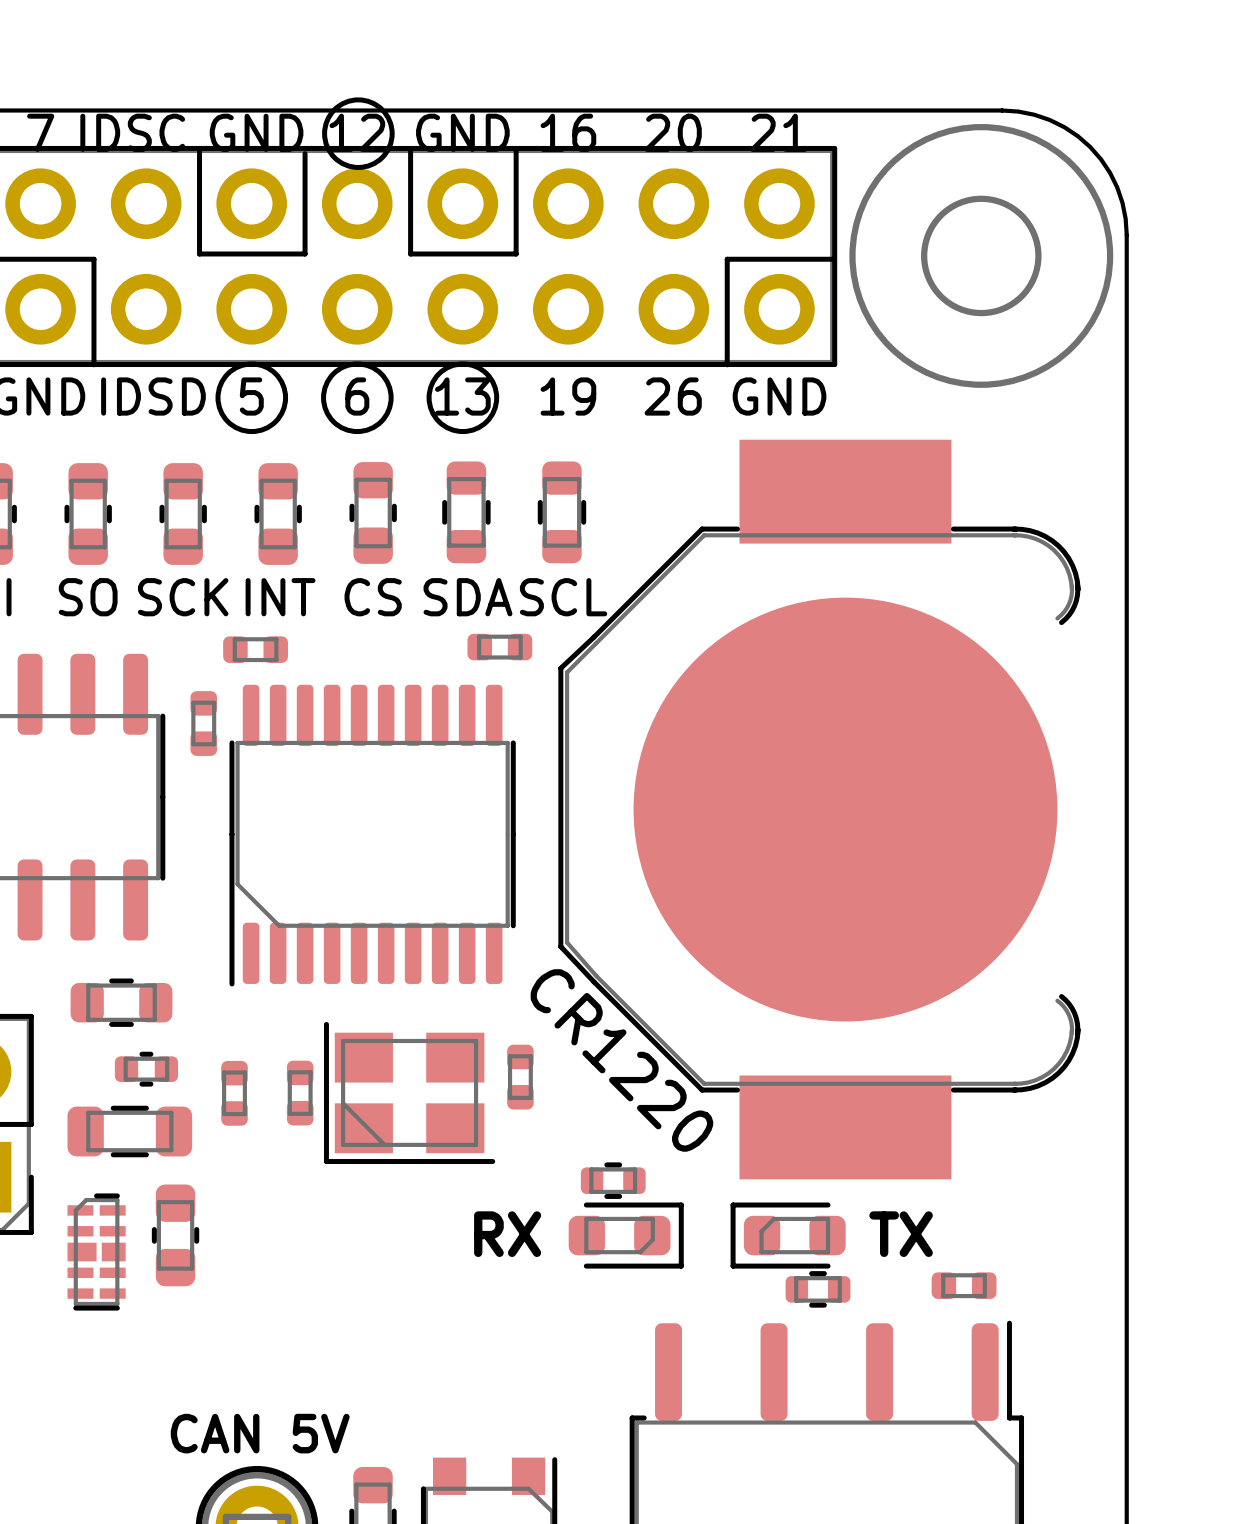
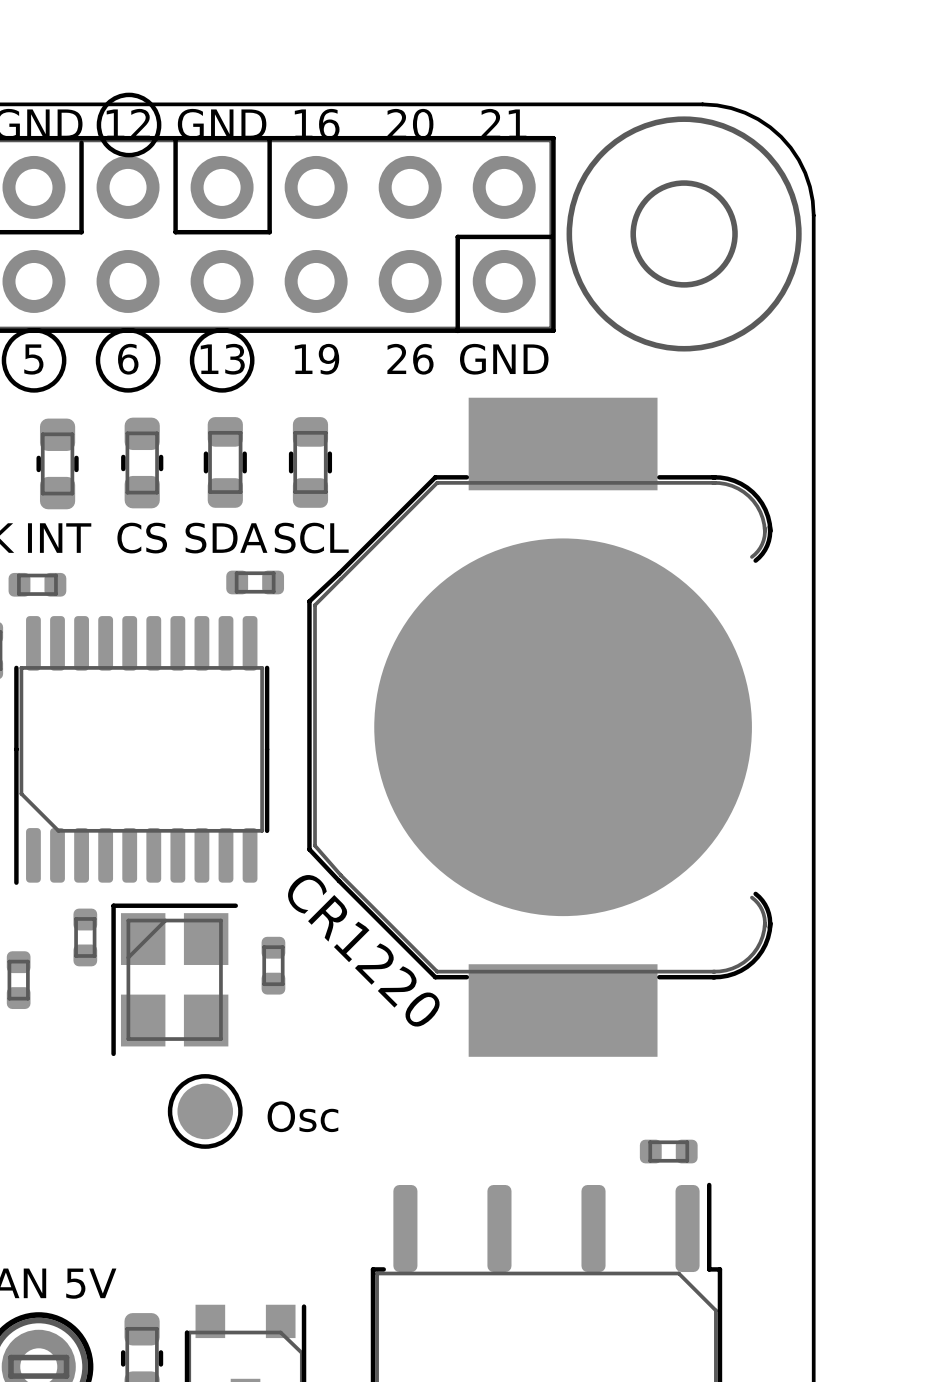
part rotation: 0° (409, 1092) -> 90° clockwise (174, 979)
part position: (300, 1093) -> (85, 937)
part: (613, 1180) -> none
text: RX (507, 1234) -> Osc (302, 1116)
text: TX (901, 1234) -> none
part: (626, 1235) -> none
part: (788, 1235) -> none
part: none -> (205, 1111)
part: (818, 1289) -> none

